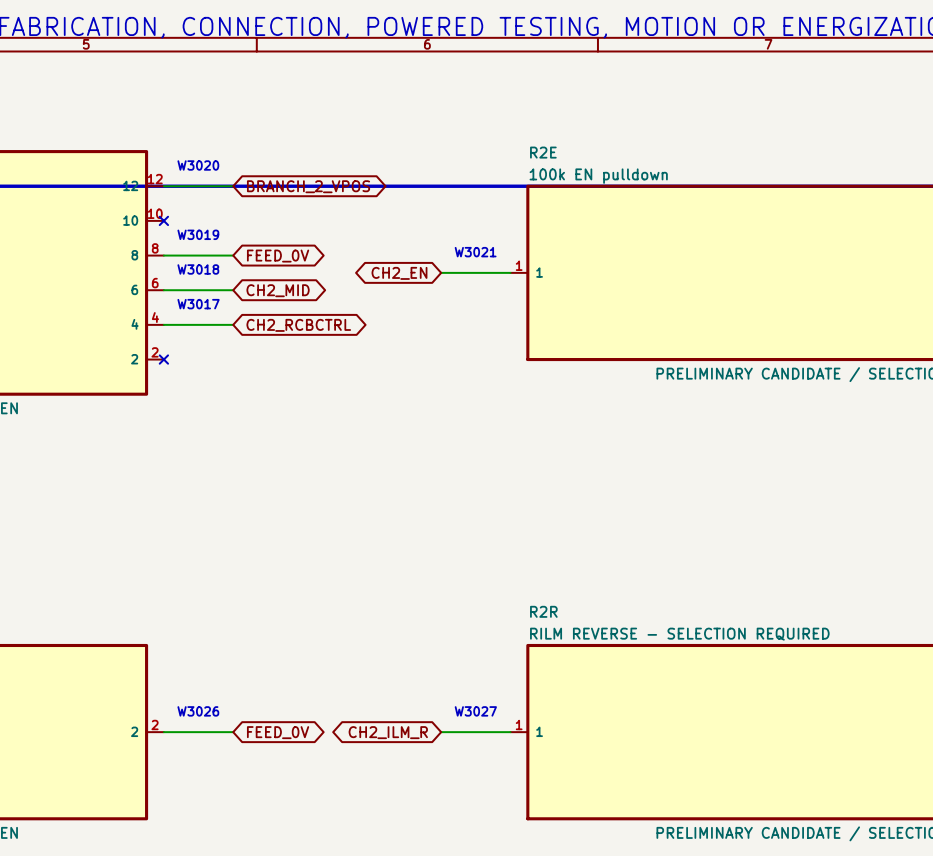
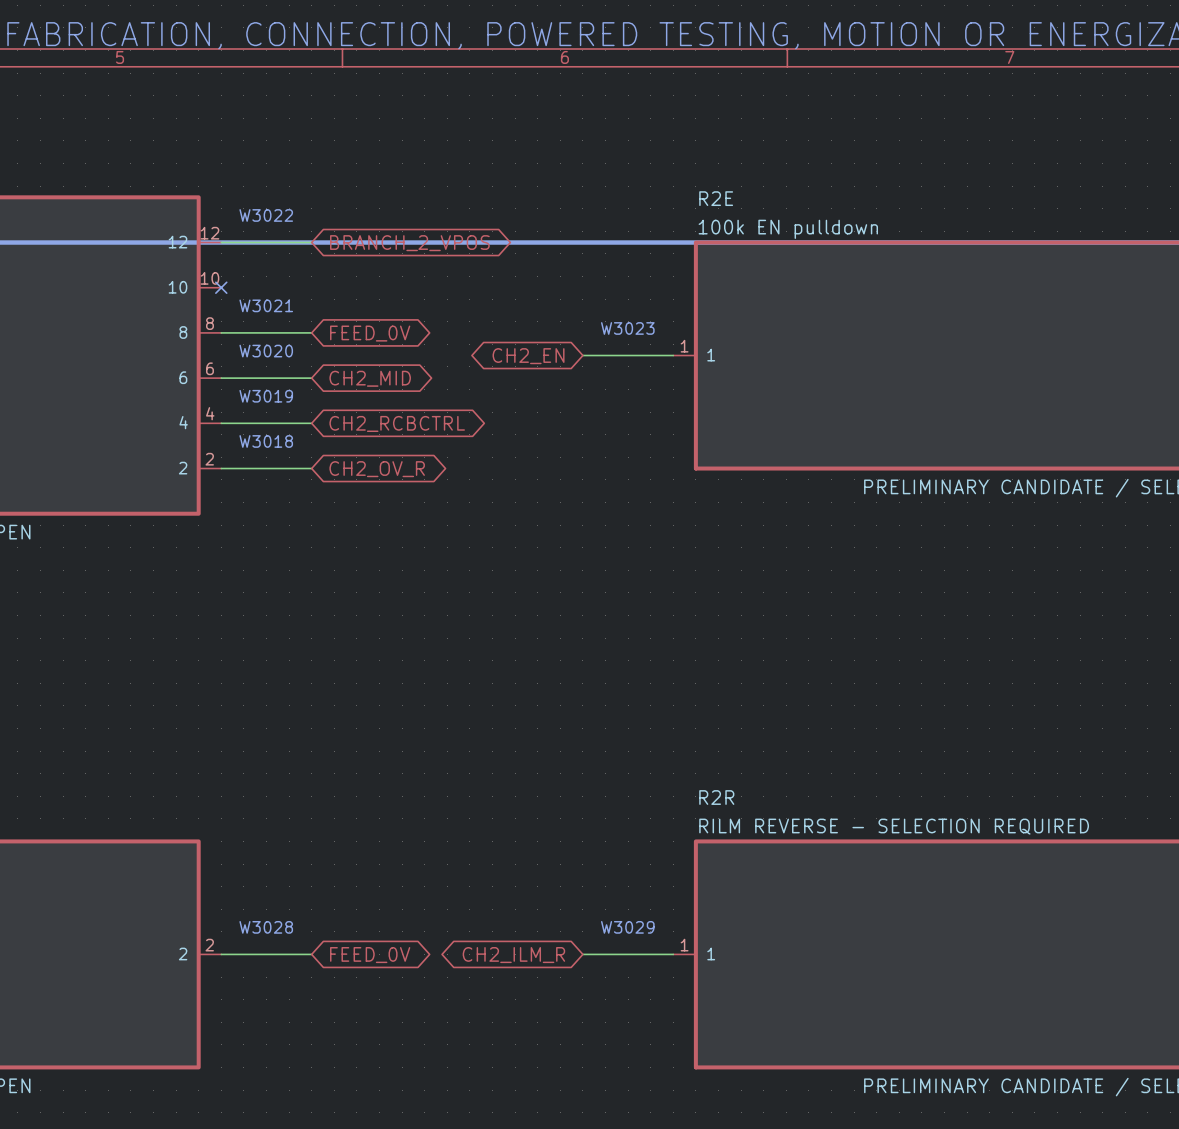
text: W3020 (198, 165) -> W3022 (266, 215)
text: W3019 (198, 234) -> W3021 (266, 305)
text: W3021 (475, 252) -> W3023 (627, 328)
text: W3018 (198, 269) -> W3020 (266, 351)
text: W3017 (198, 304) -> W3019 (266, 396)
text: none -> W3018 (266, 441)
wire: none -> (221, 468) (311, 468)
no-connect mark: (163, 359) -> none
global label: none -> CH2_OV_R (377, 469)
text: W3026 (198, 711) -> W3028 (266, 927)
text: W3027 (475, 711) -> W3029 (627, 927)

